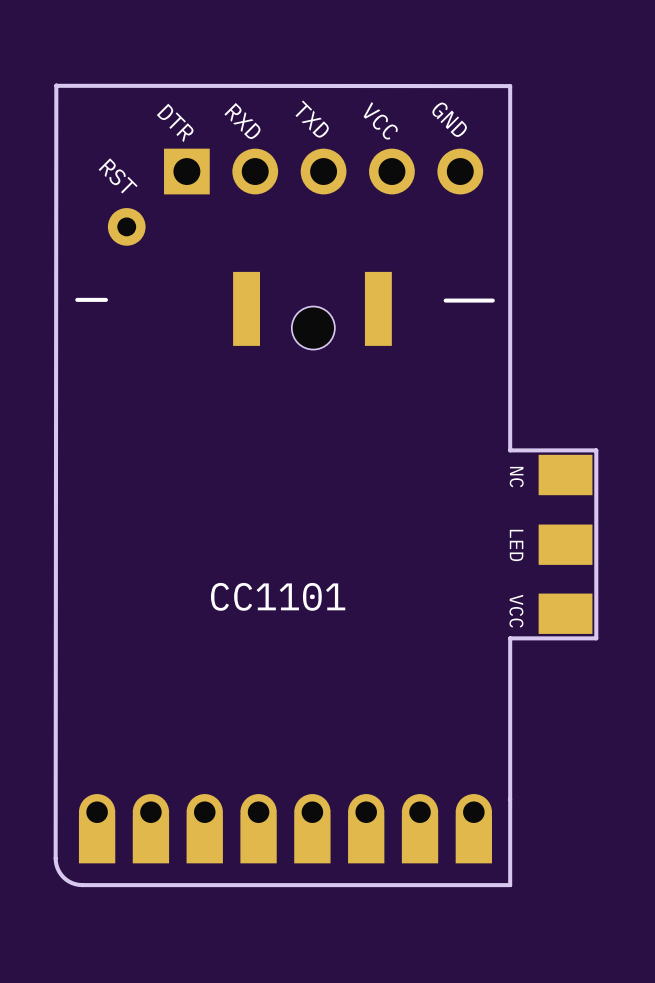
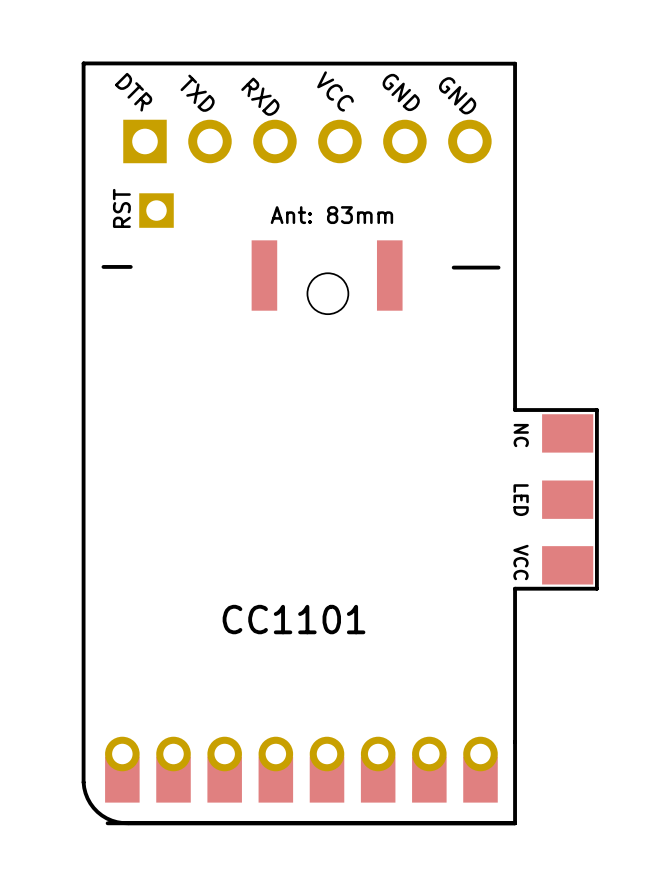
board edge: (56, 85) (55, 858) (57, 868) (63, 877) (72, 883) (82, 885) -> (83, 63) (83, 782) (90, 803) (106, 818) (122, 823) (515, 823)
text: none -> GND (401, 92)
text position: TXD (312, 119) -> TXD (197, 93)
text position: VCC (380, 120) -> VCC (335, 91)
text position: DTR (175, 122) -> DTR (133, 92)
part: none -> (307, 141)
part: (323, 171) -> none
text rotation: 0° (118, 175) -> 135° counterclockwise (121, 208)
text position: RST (118, 175) -> RST (121, 208)
part footprint: [107, 208, 146, 246] -> [139, 193, 174, 228]
text: none -> Ant: 83mm (331, 215)
CC1101 name position: CC1101 (278, 596) -> CC1101 (294, 619)

